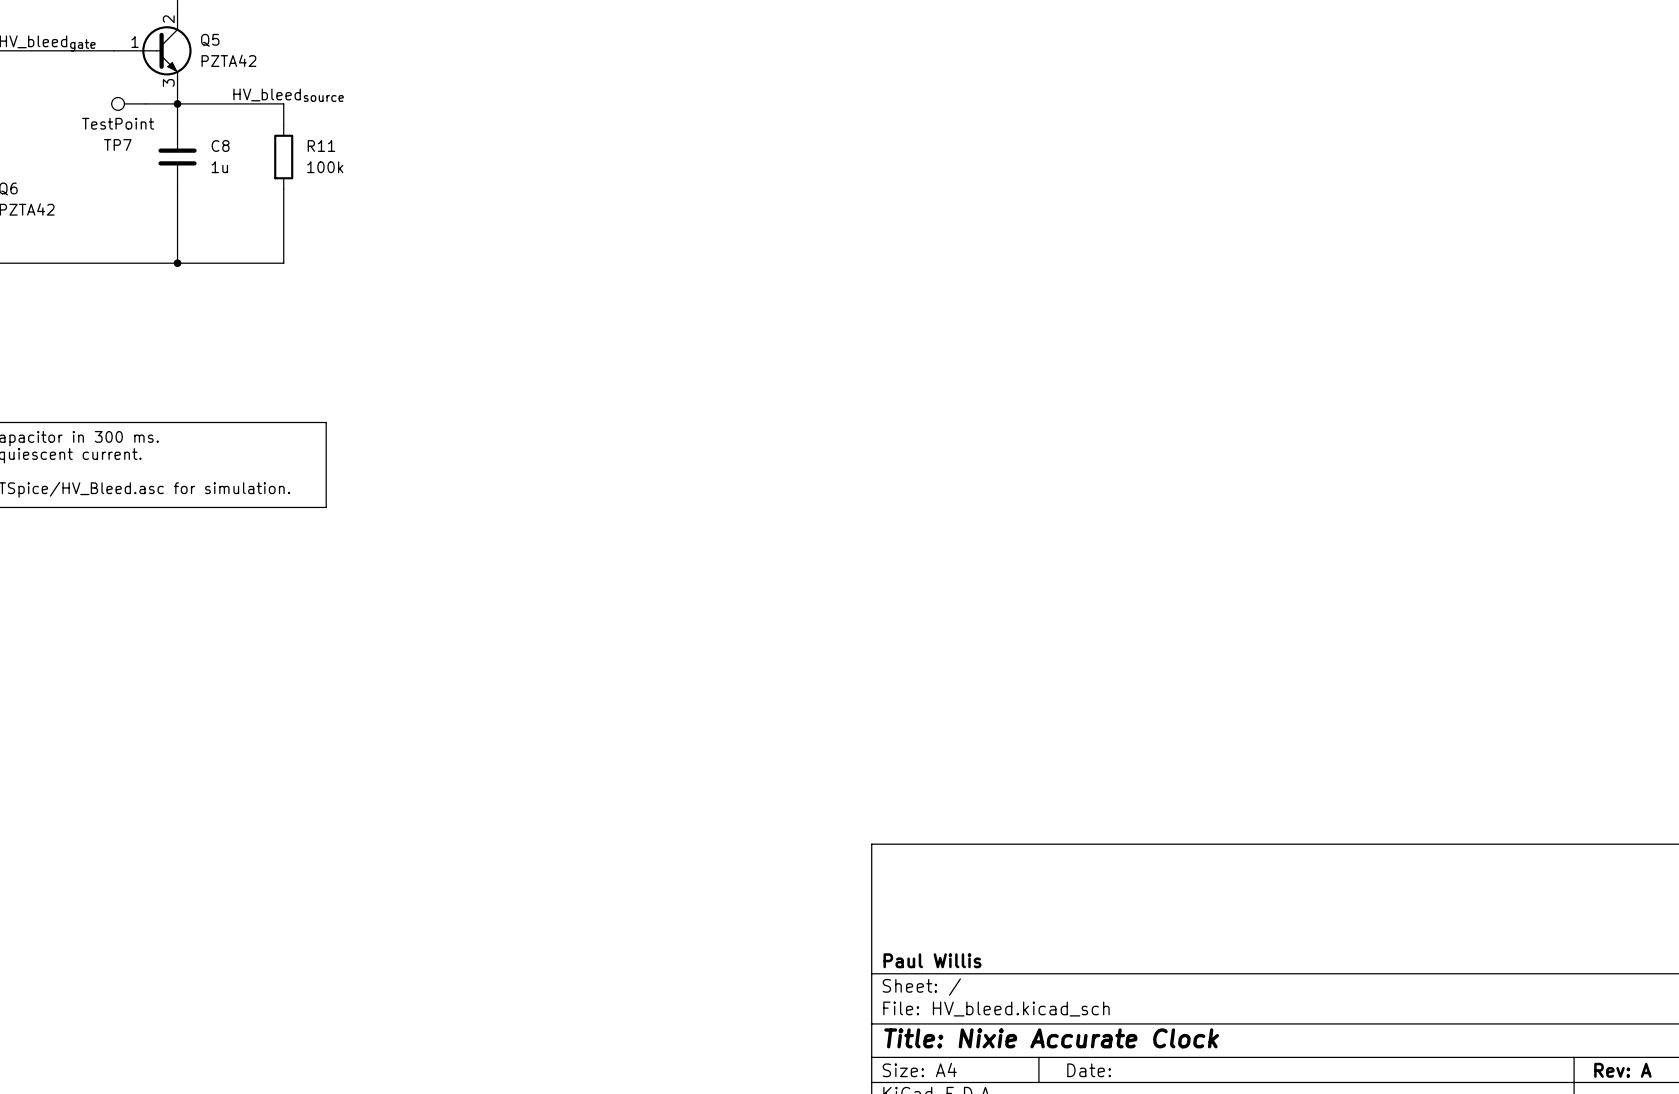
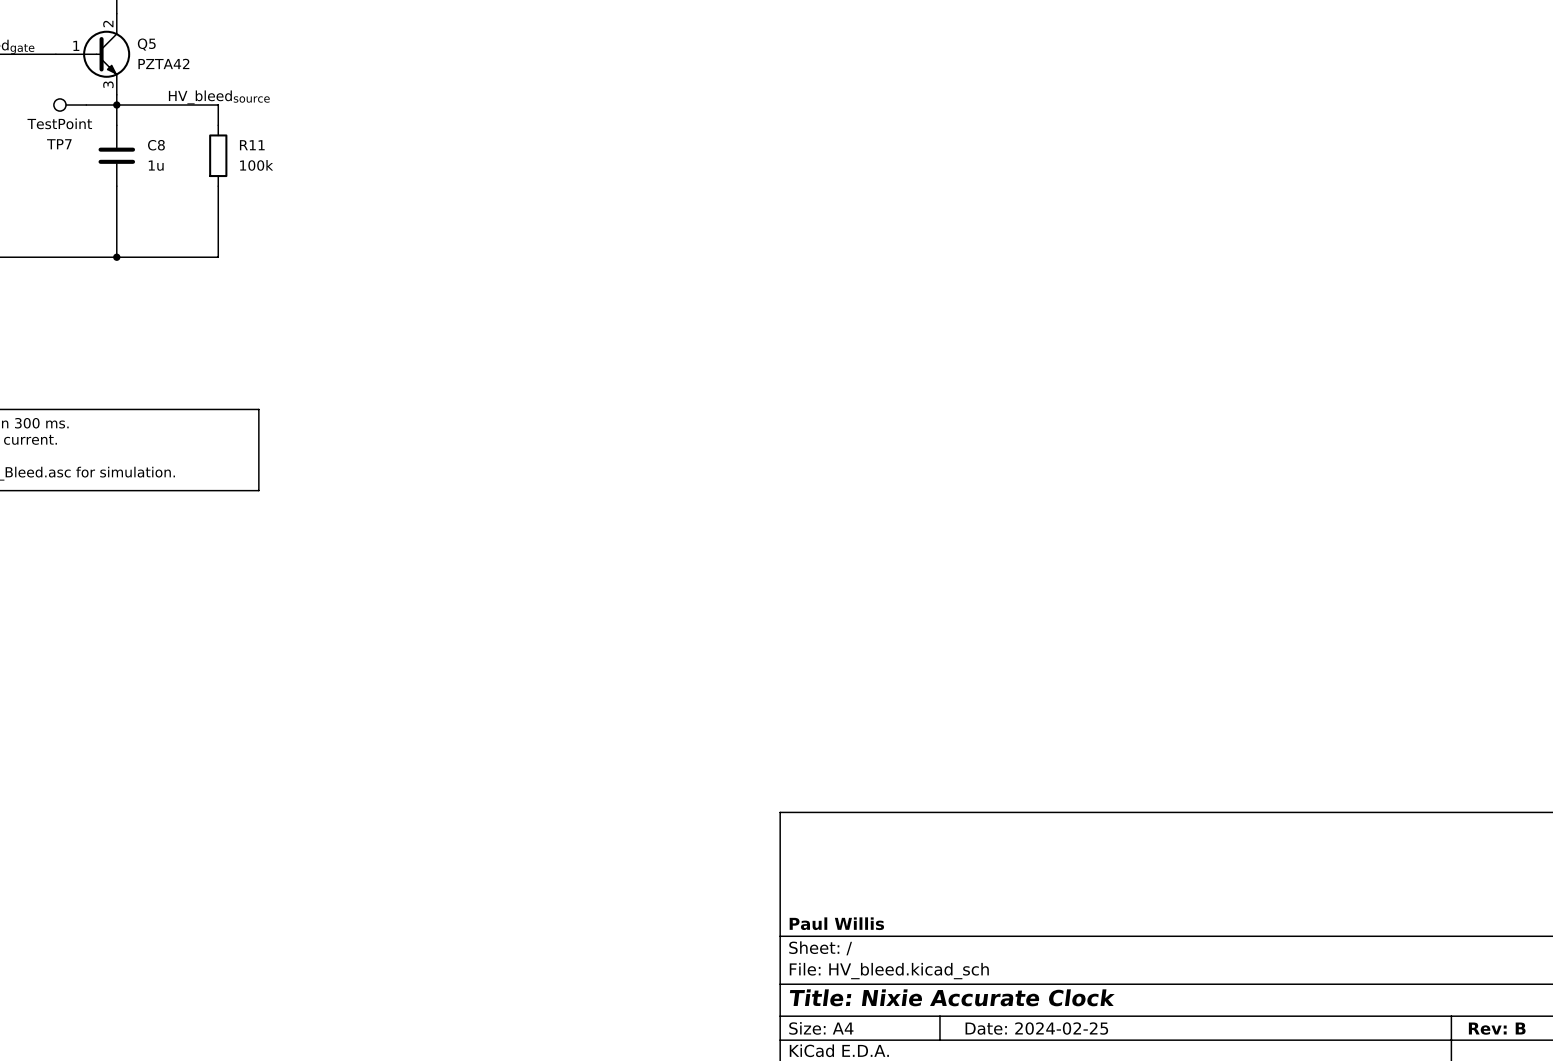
title block: Date: (1089, 1070) -> Date: 2024-02-25 (1036, 1028)
title block: Rev: A (1622, 1070) -> Rev: B (1497, 1028)

